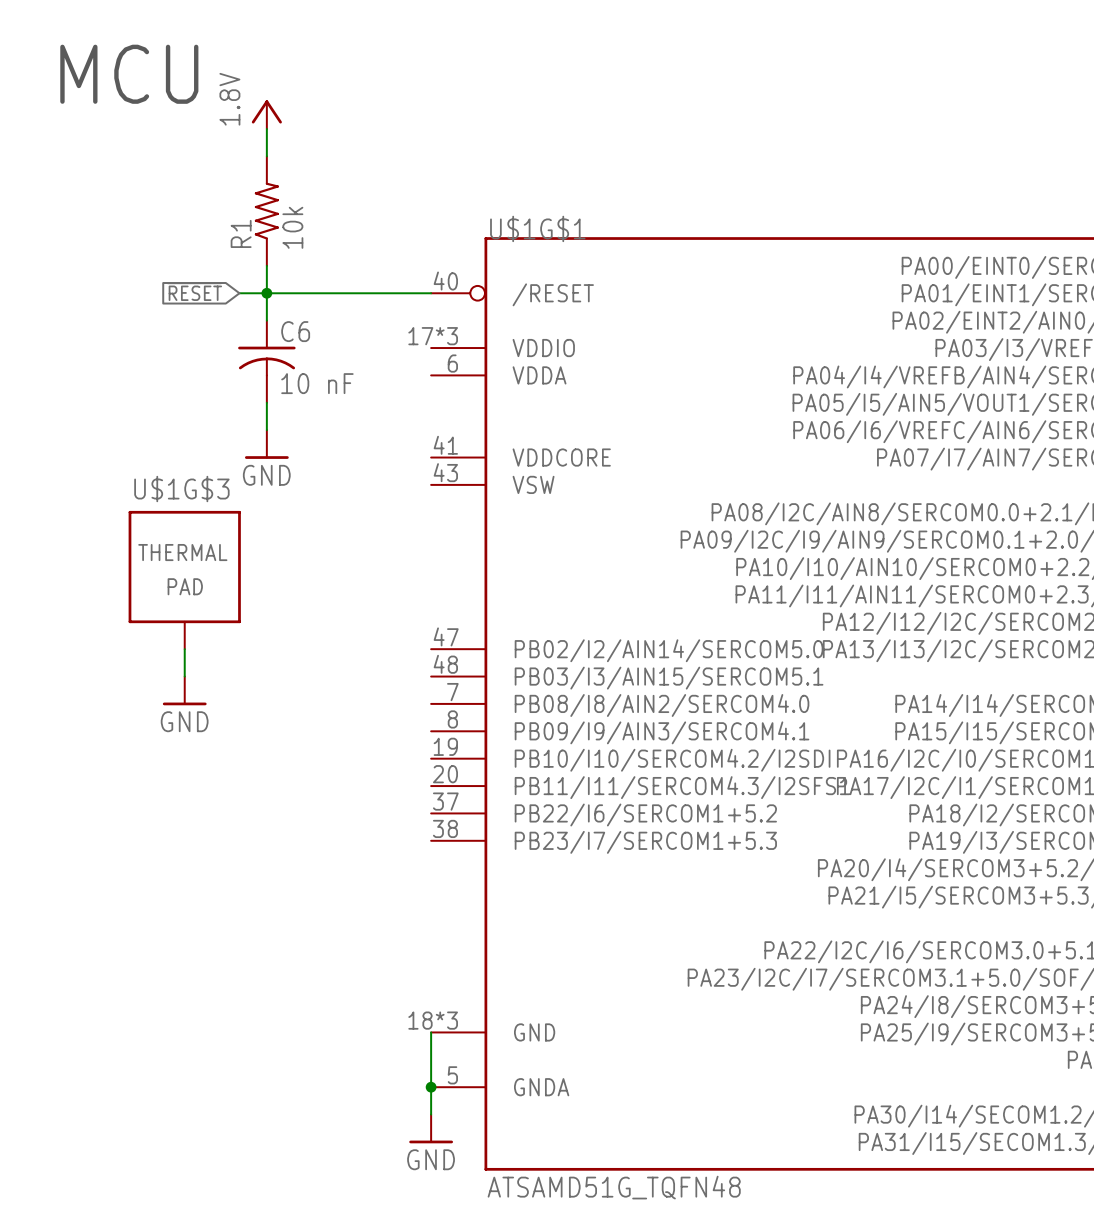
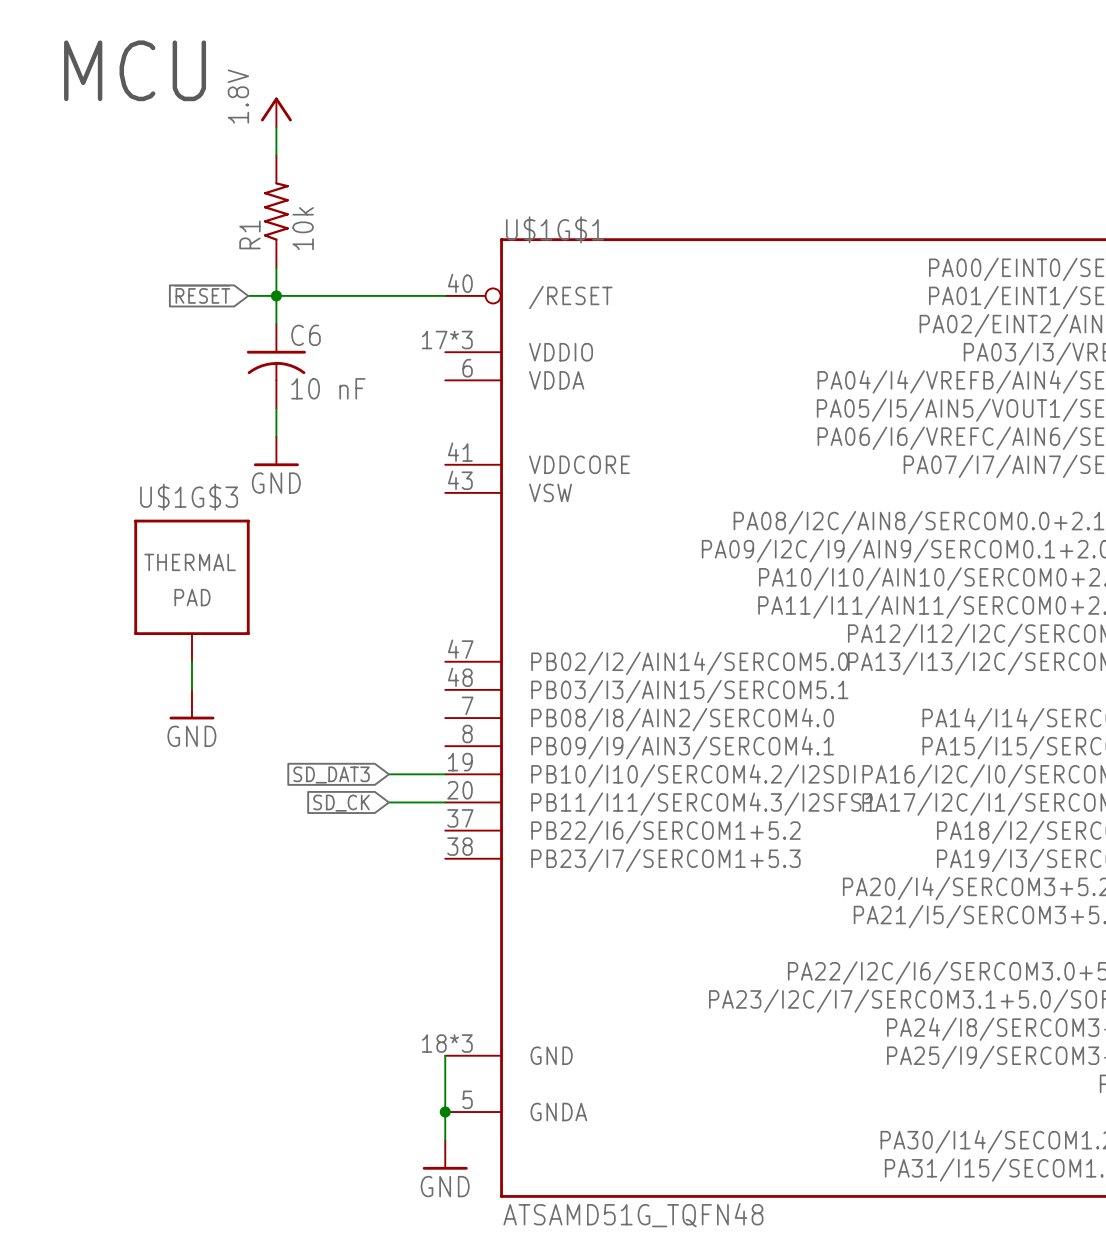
wire: none -> (388, 774) (445, 774)
global label: none -> SD_DAT3 (331, 774)
global label: none -> SD_CK (341, 803)
wire: none -> (388, 802) (445, 802)

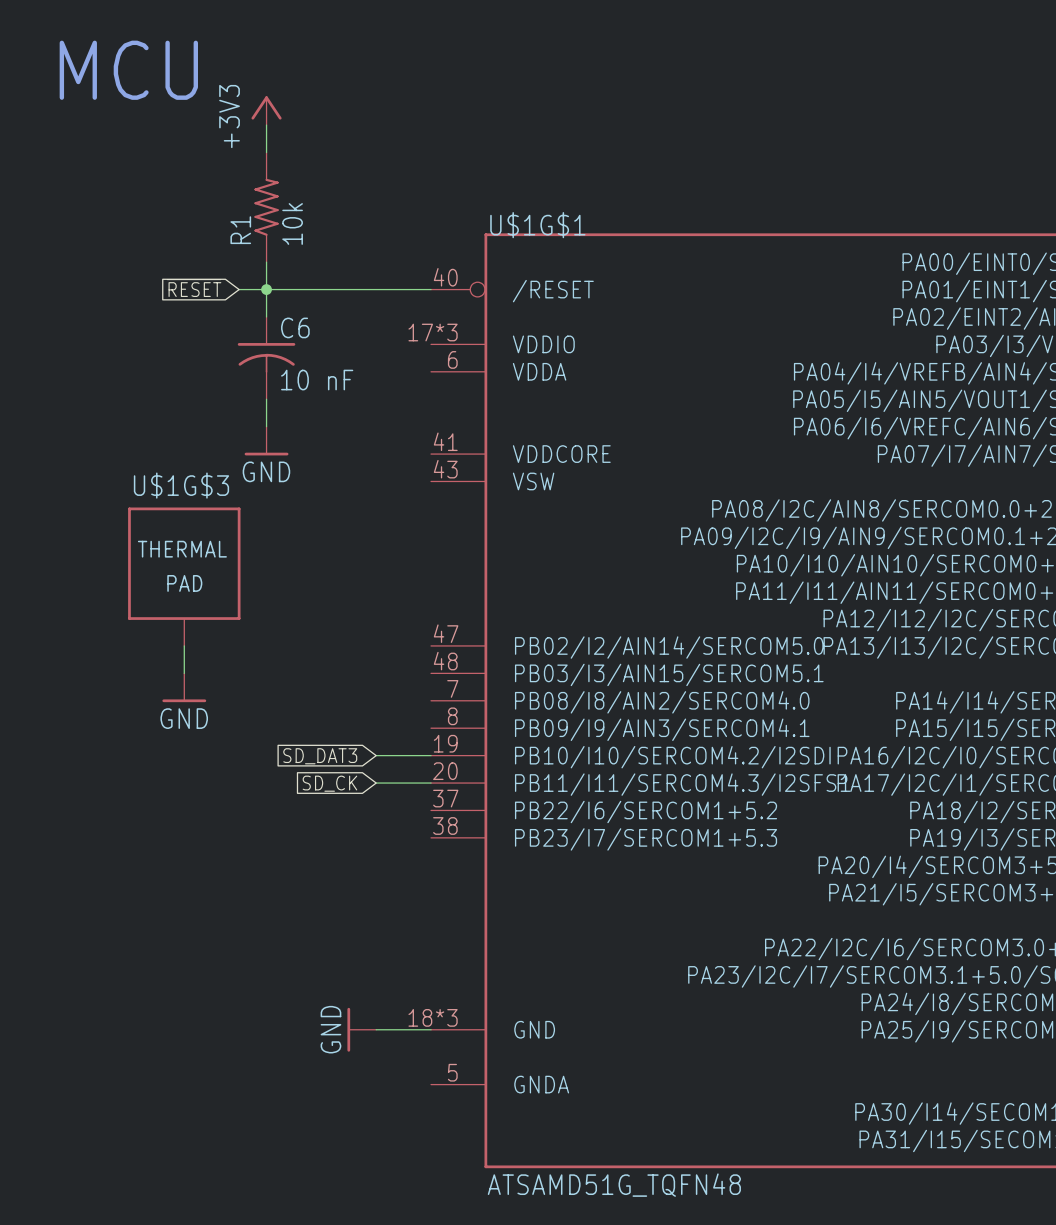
power symbol: 1.8V (276, 112) -> +3V3 (266, 110)
wire: (445, 1055) (445, 1140) -> (431, 1029) (376, 1029)
junction: (445, 1112) -> none
power symbol position: GND (445, 1154) -> GND (361, 1029)
power symbol rotation: 0° (445, 1168) -> 90° clockwise (348, 1029)

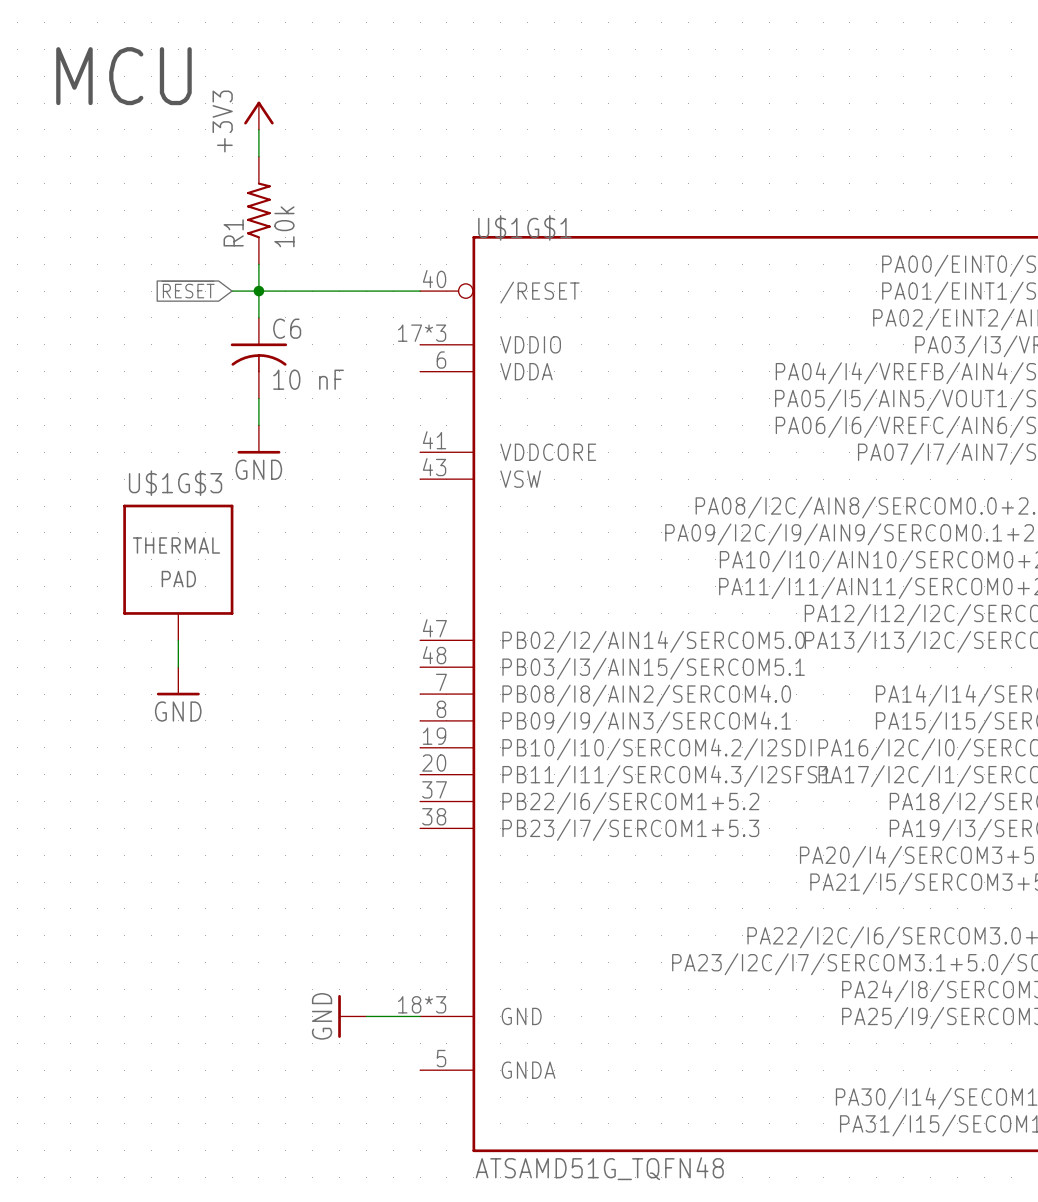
wire: (376, 755) (431, 755) -> none
global label: SD_DAT3 (320, 756) -> none
global label: SD_CK (329, 783) -> none
wire: (376, 783) (431, 783) -> none

